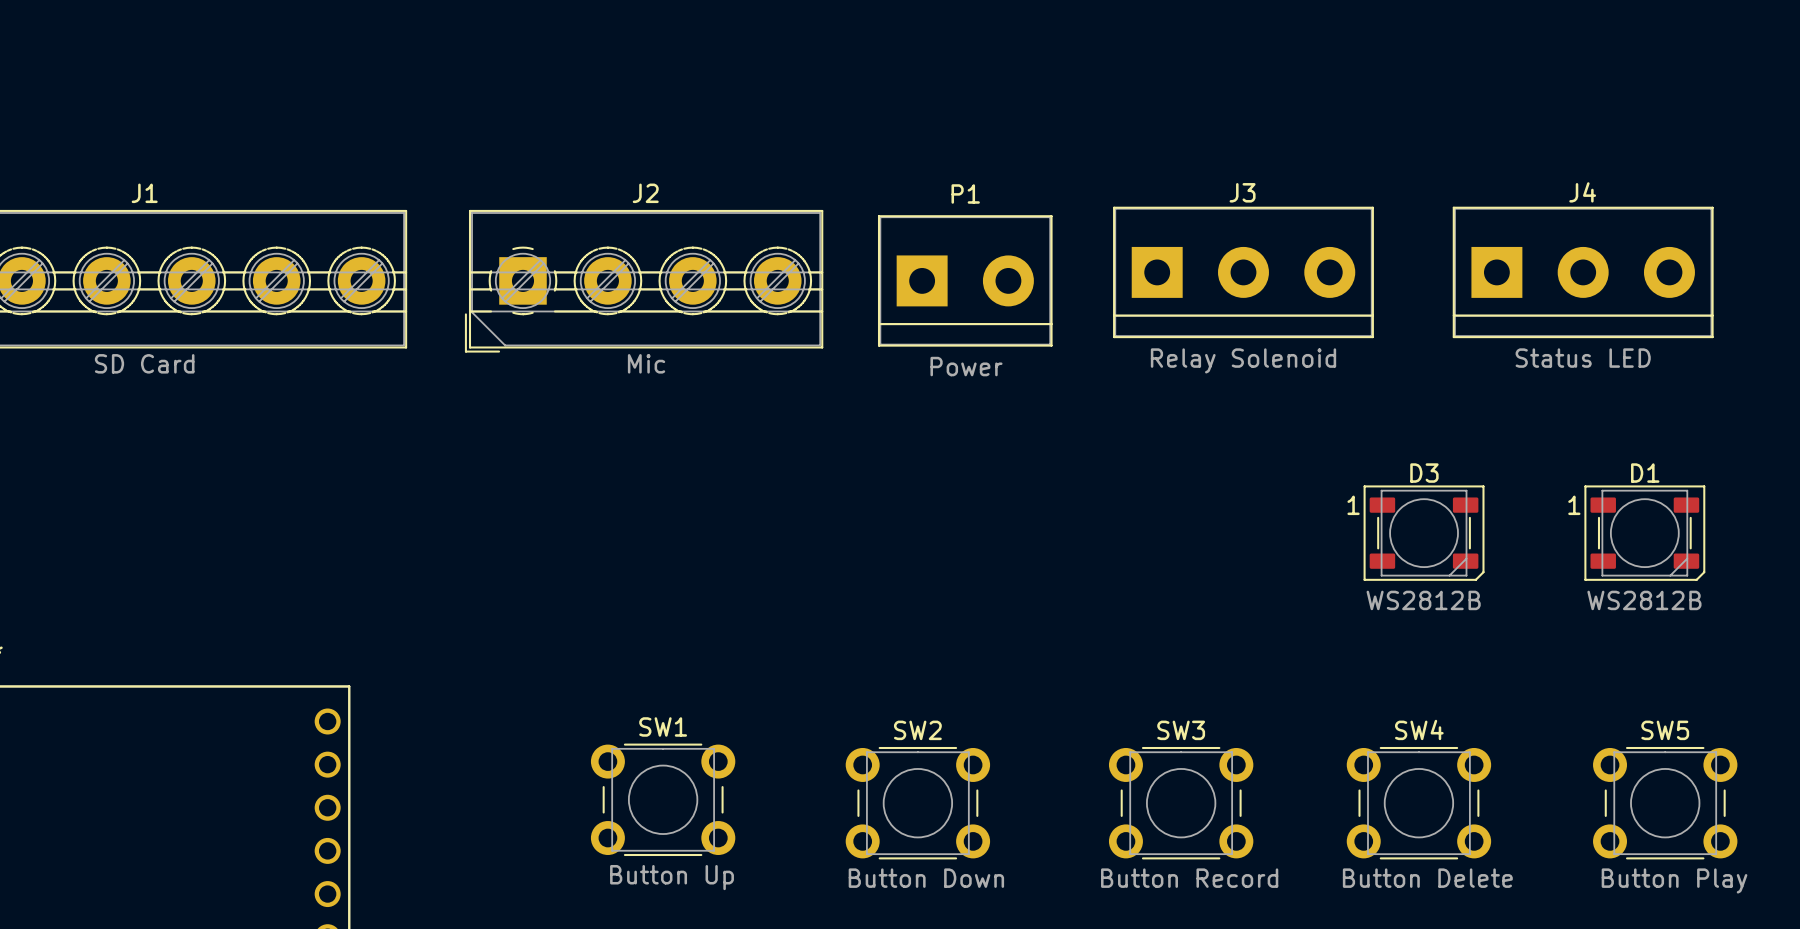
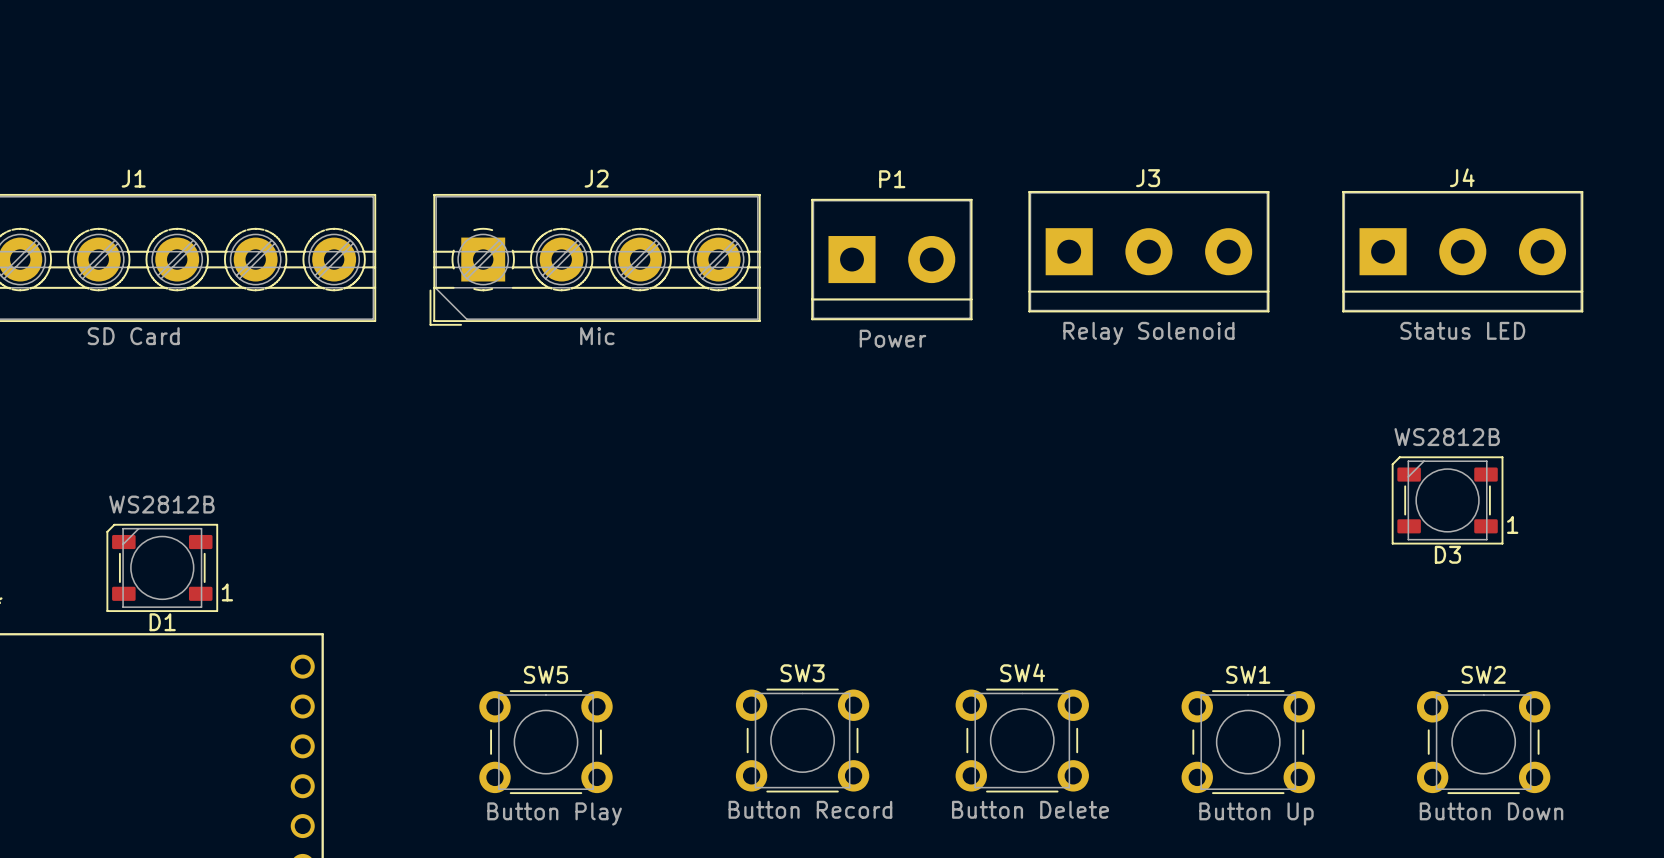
D3 rotation: 0° (1424, 533) -> 180° (1447, 500)
D3 position: (1424, 533) -> (1447, 500)
D1 rotation: 0° (1644, 533) -> 180° (162, 567)
D1 position: (1644, 533) -> (162, 567)
SW1 position: (663, 799) -> (1248, 742)
SW2 position: (917, 803) -> (1483, 742)
SW3 position: (1181, 803) -> (802, 740)
SW4 position: (1418, 803) -> (1022, 740)
SW5 position: (1665, 803) -> (545, 742)

